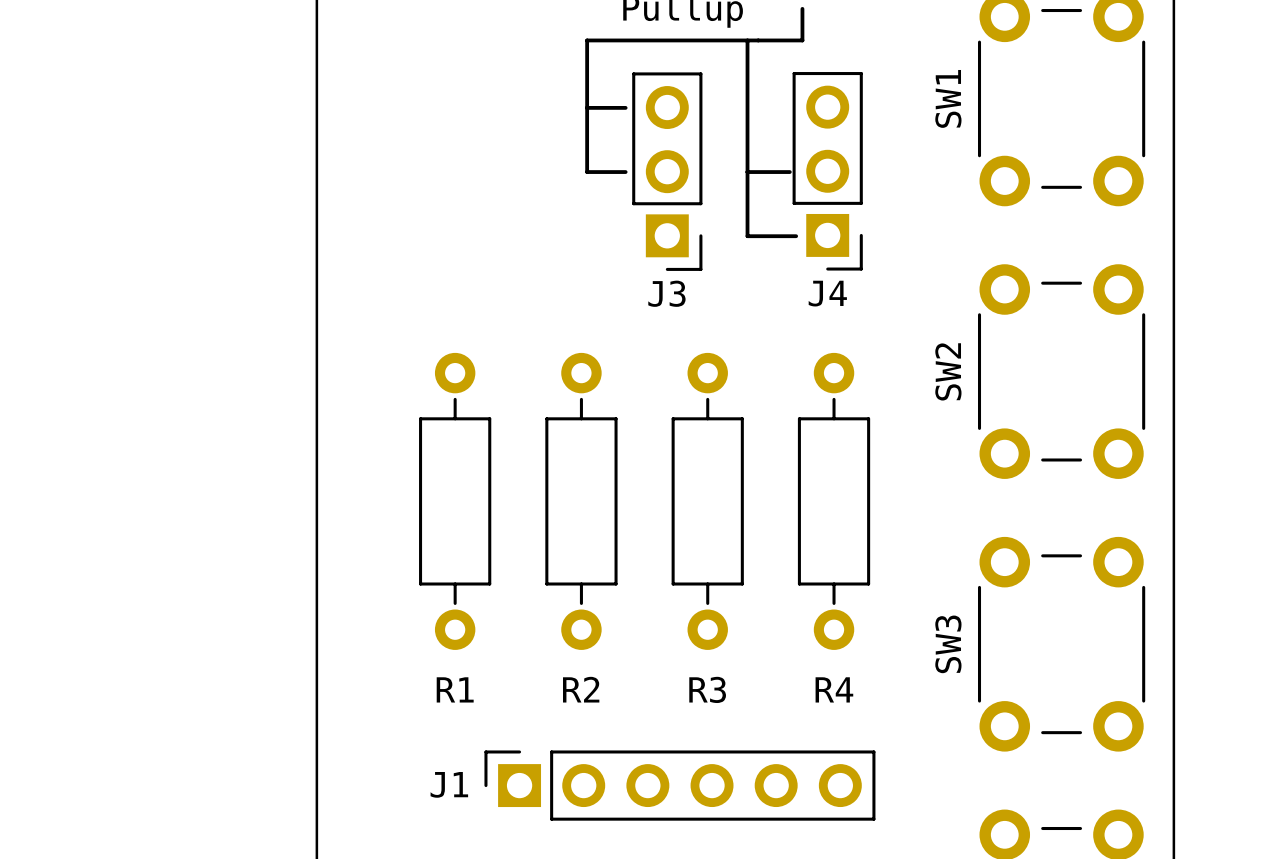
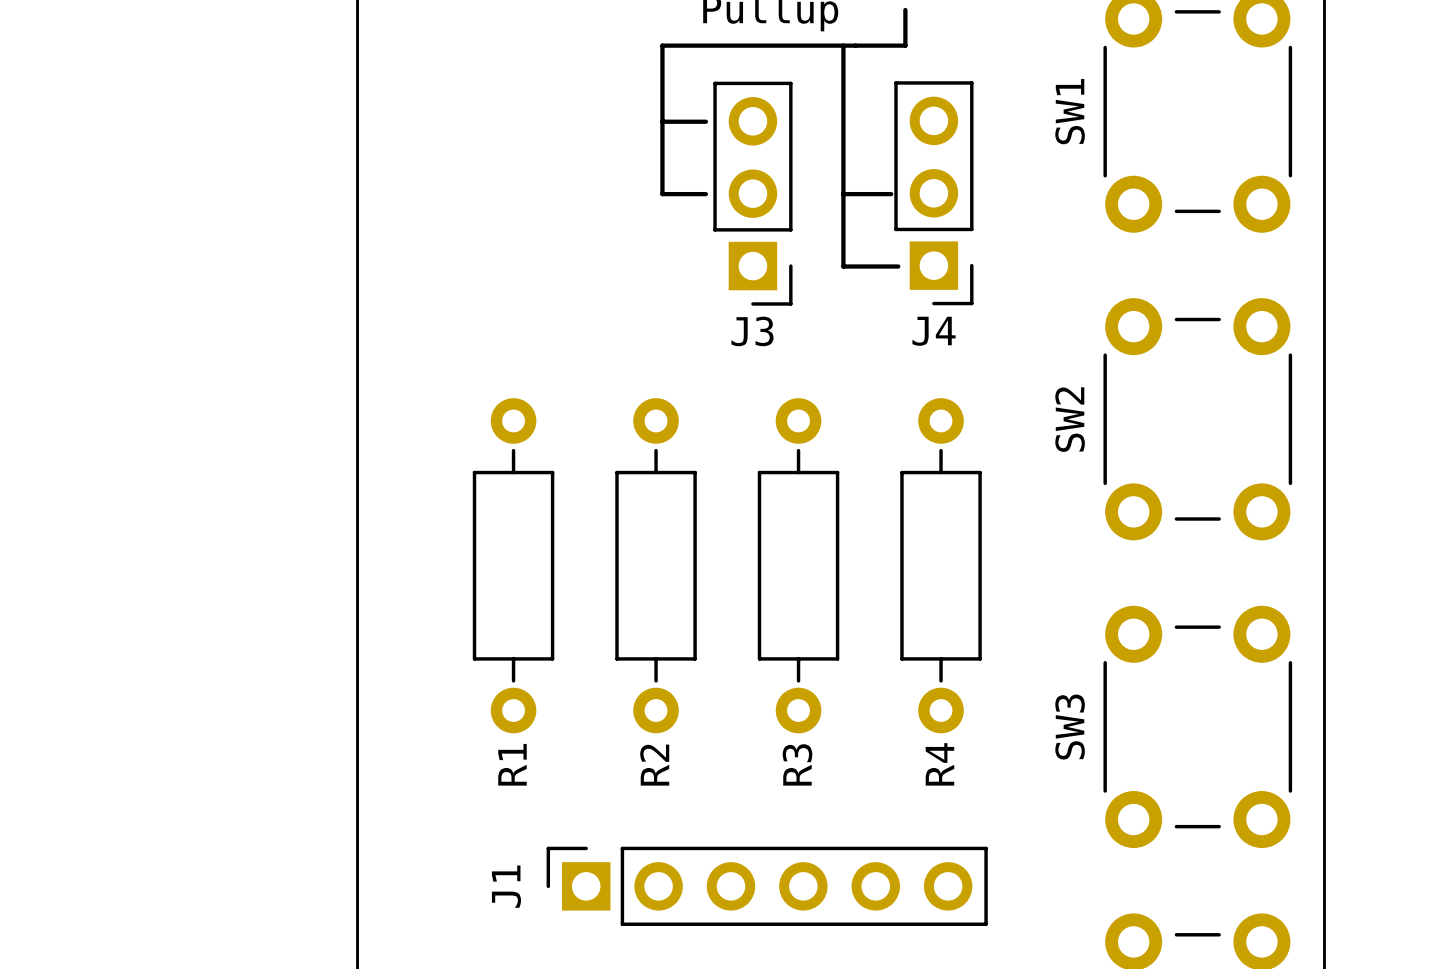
R1 name rotation: 0° (455, 689) -> 90° counterclockwise (512, 764)
R2 name rotation: 0° (581, 689) -> 90° counterclockwise (654, 765)
R3 name rotation: 0° (707, 689) -> 90° counterclockwise (797, 764)
R4 name rotation: 0° (834, 689) -> 90° counterclockwise (939, 764)
J1 name rotation: 0° (449, 784) -> 90° counterclockwise (506, 886)

